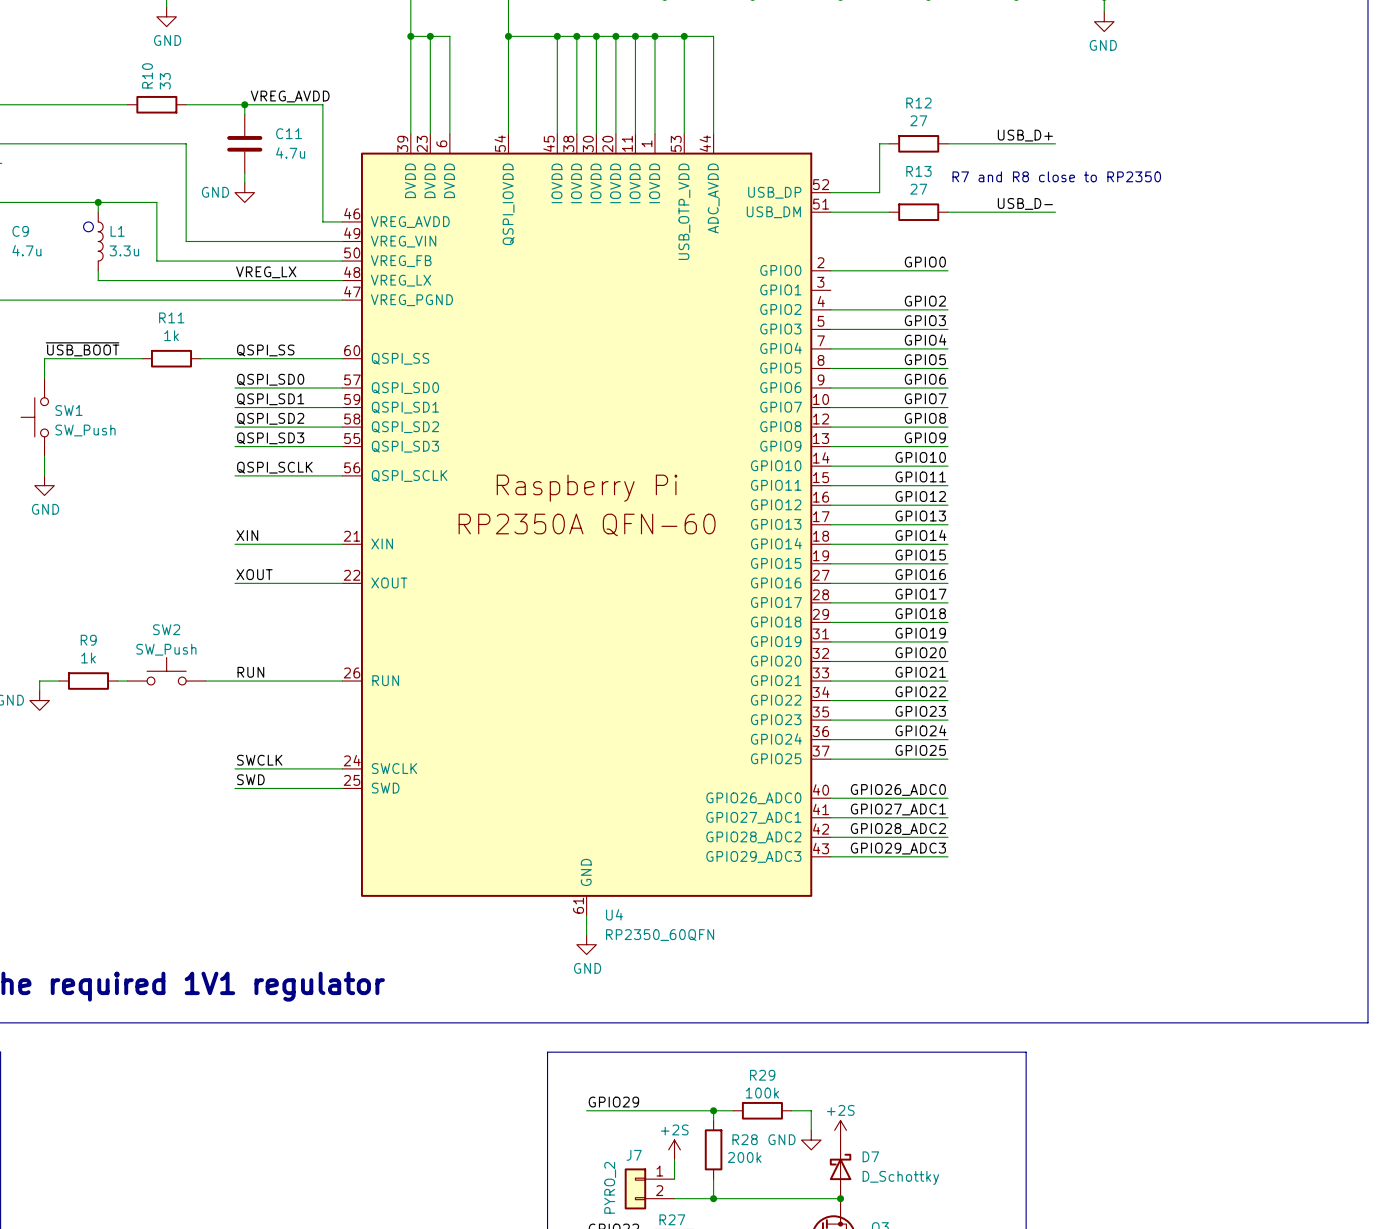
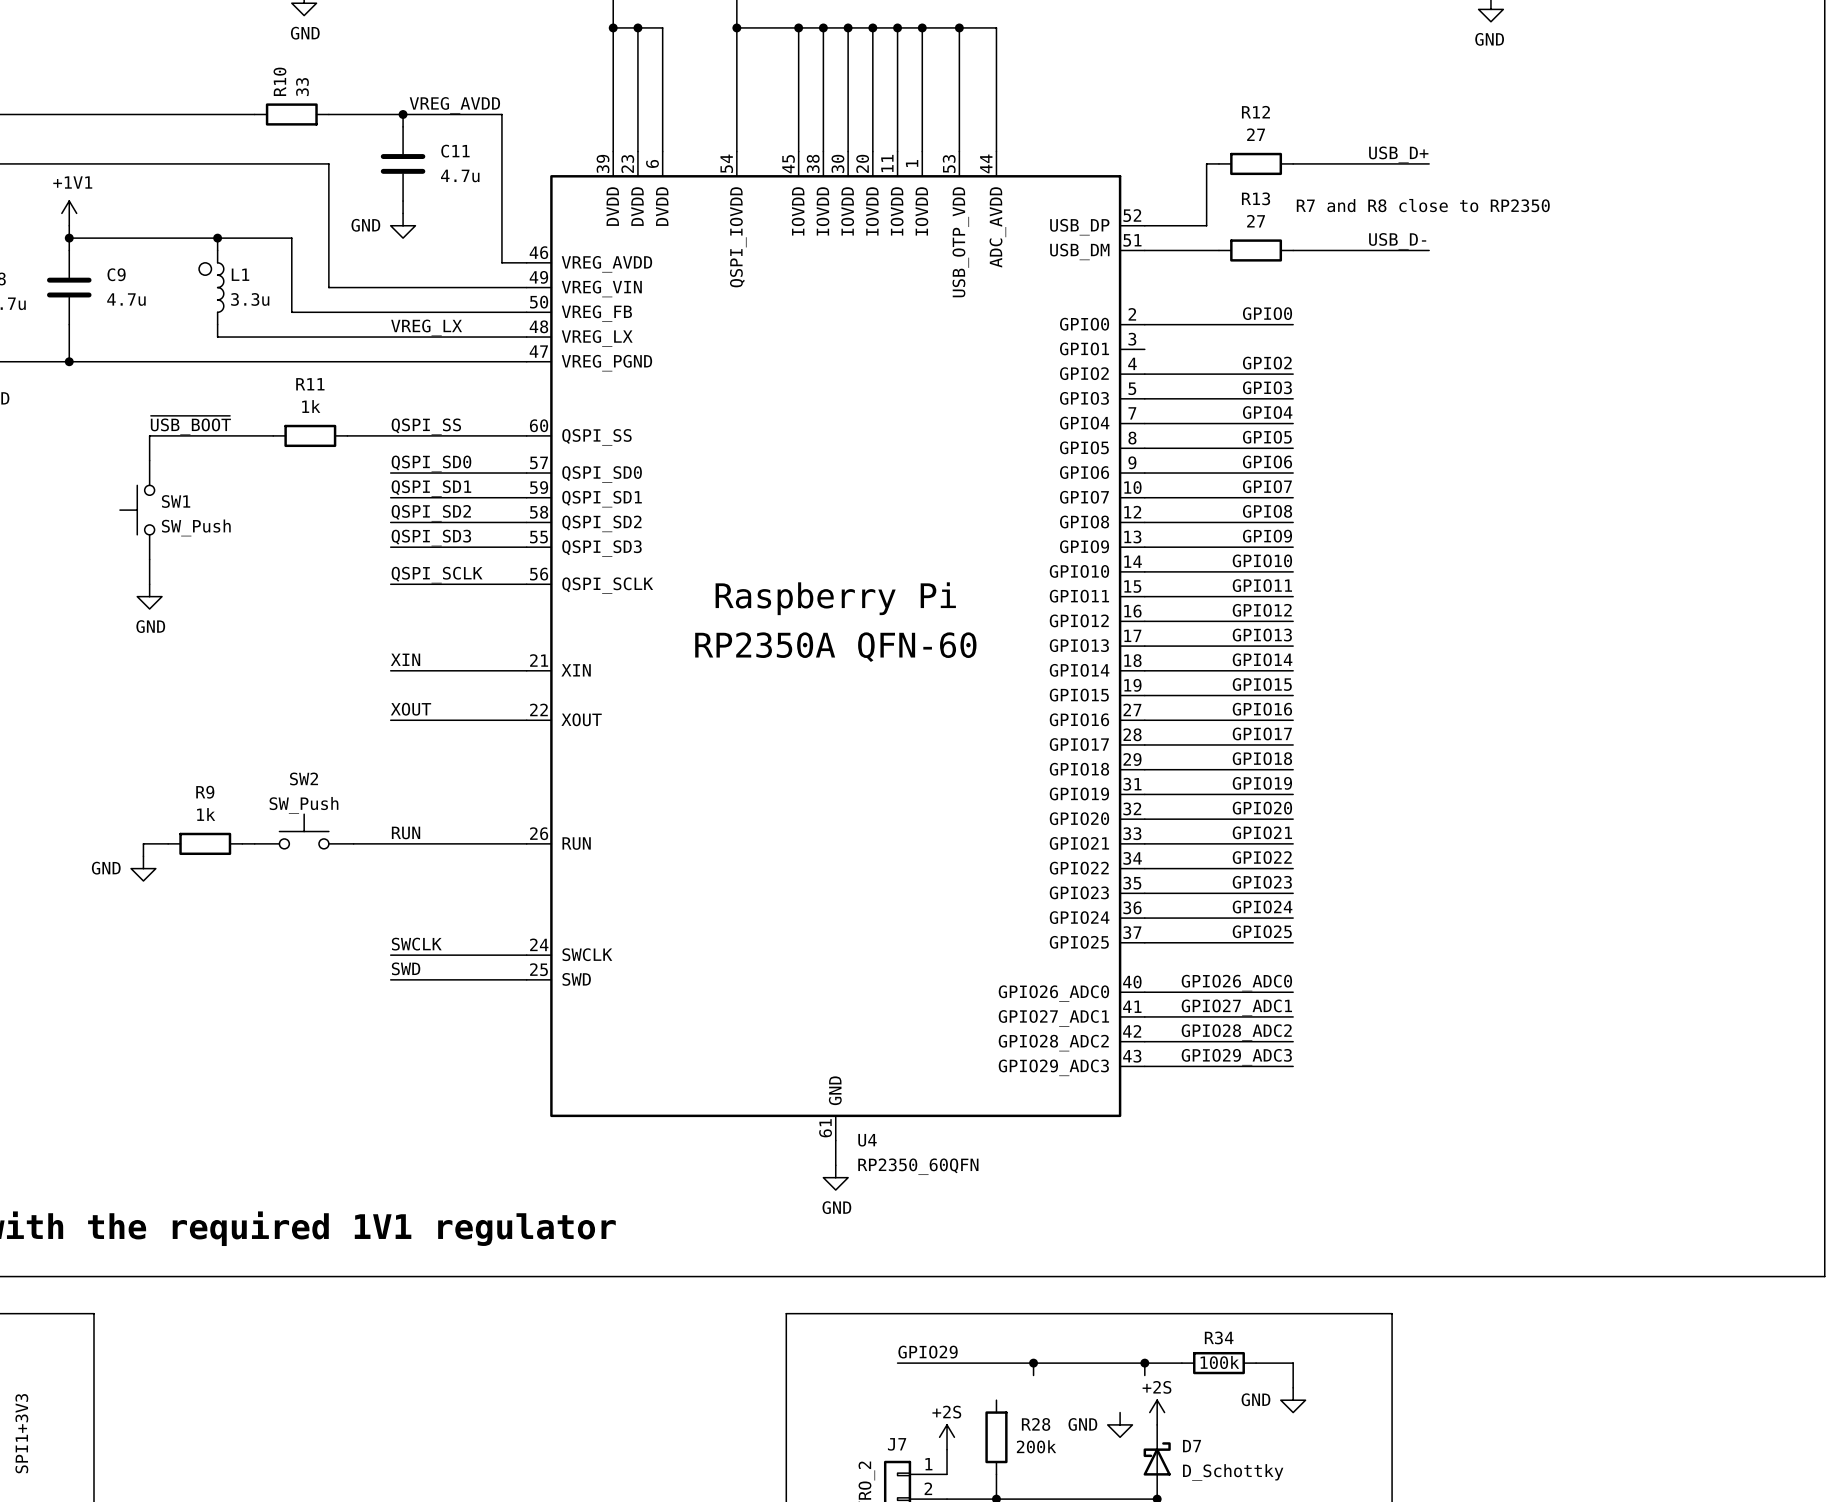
wire: none -> (897, 1363) (1181, 1363)
wire: none -> (1144, 1363) (1144, 1375)
junction: none -> (1144, 1363)
R34: none -> 100k (1218, 1363)
wire: none -> (1256, 1363) (1293, 1363) (1293, 1387)
label position: GPIO29 (613, 1102) -> GPIO29 (928, 1352)
wire: (586, 1110) (733, 1110) -> none
wire: (713, 1110) (713, 1120) -> (1033, 1363) (1033, 1375)
junction position: (713, 1110) -> (1033, 1363)
R29: 100k (762, 1110) -> none
wire: (791, 1110) (811, 1110) (811, 1130) -> none
power symbol: none -> GND (1293, 1400)

